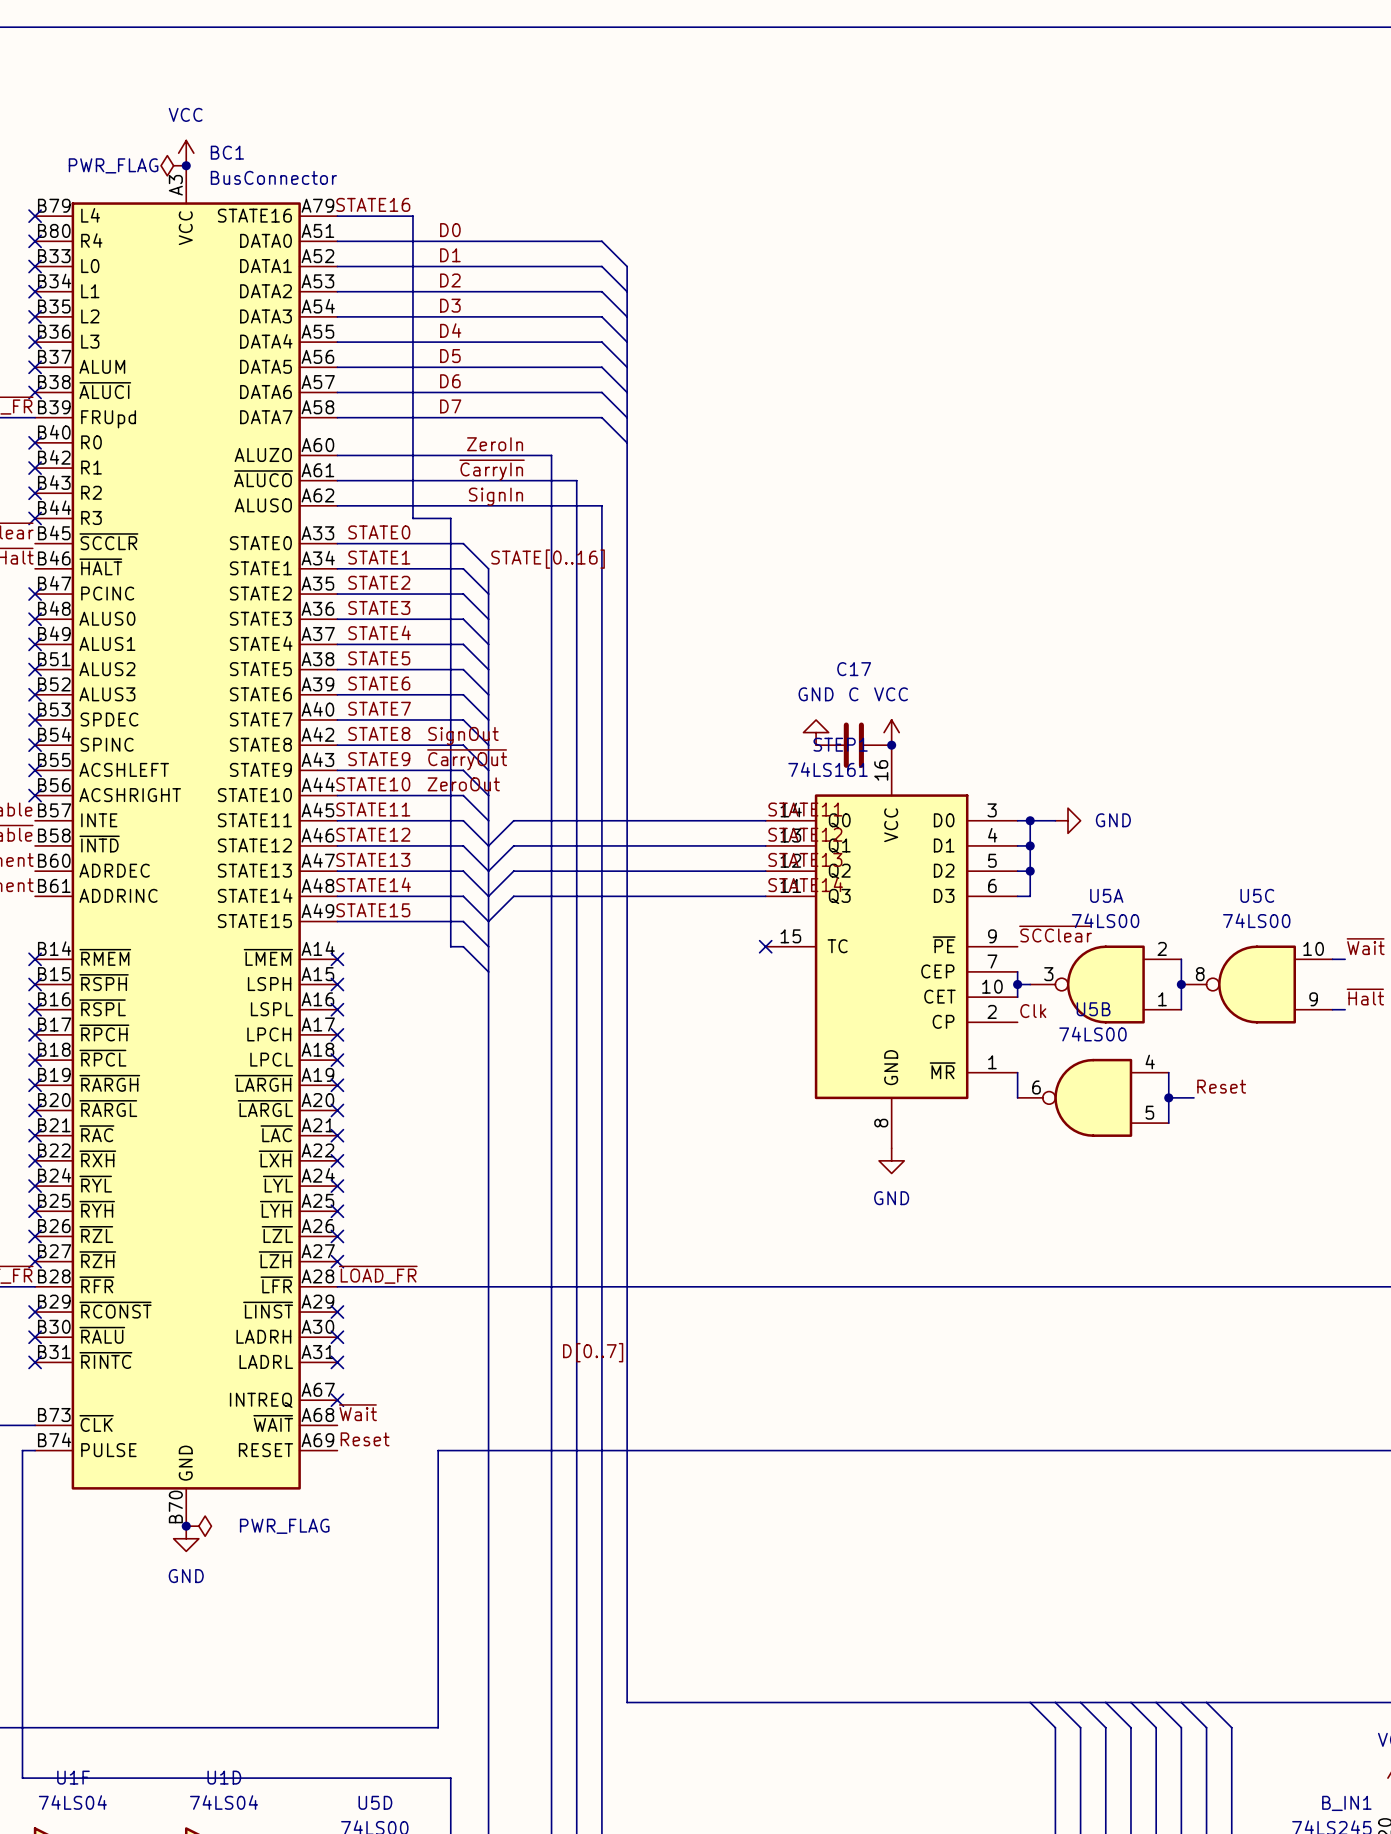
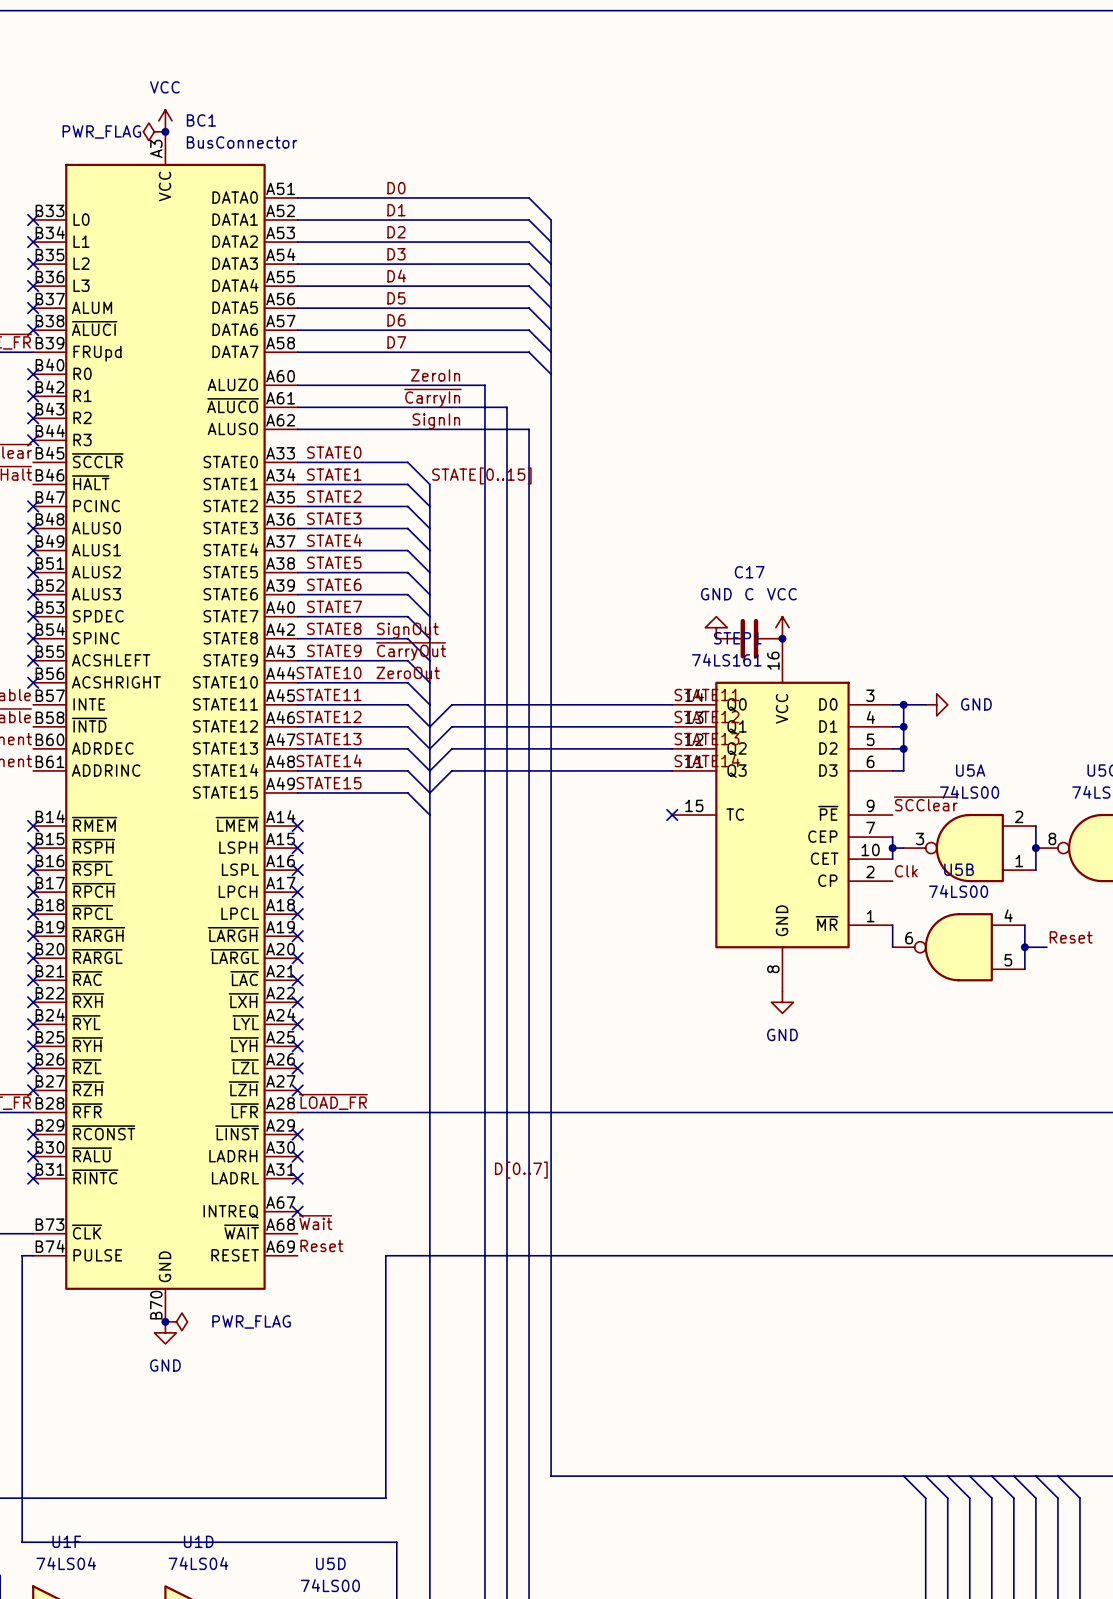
BC1 symbol: [35, 165, 338, 1527] -> [33, 131, 298, 1322]
label: STATE16 (373, 204) -> none
no-connect mark: (35, 216) -> none
wire: (337, 216) (412, 216) (412, 518) (450, 518) (450, 946) (463, 946) (488, 971) -> none
no-connect mark: (35, 241) -> none
label: STATE[0..16] (548, 559) -> STATE[0..15] (481, 475)

